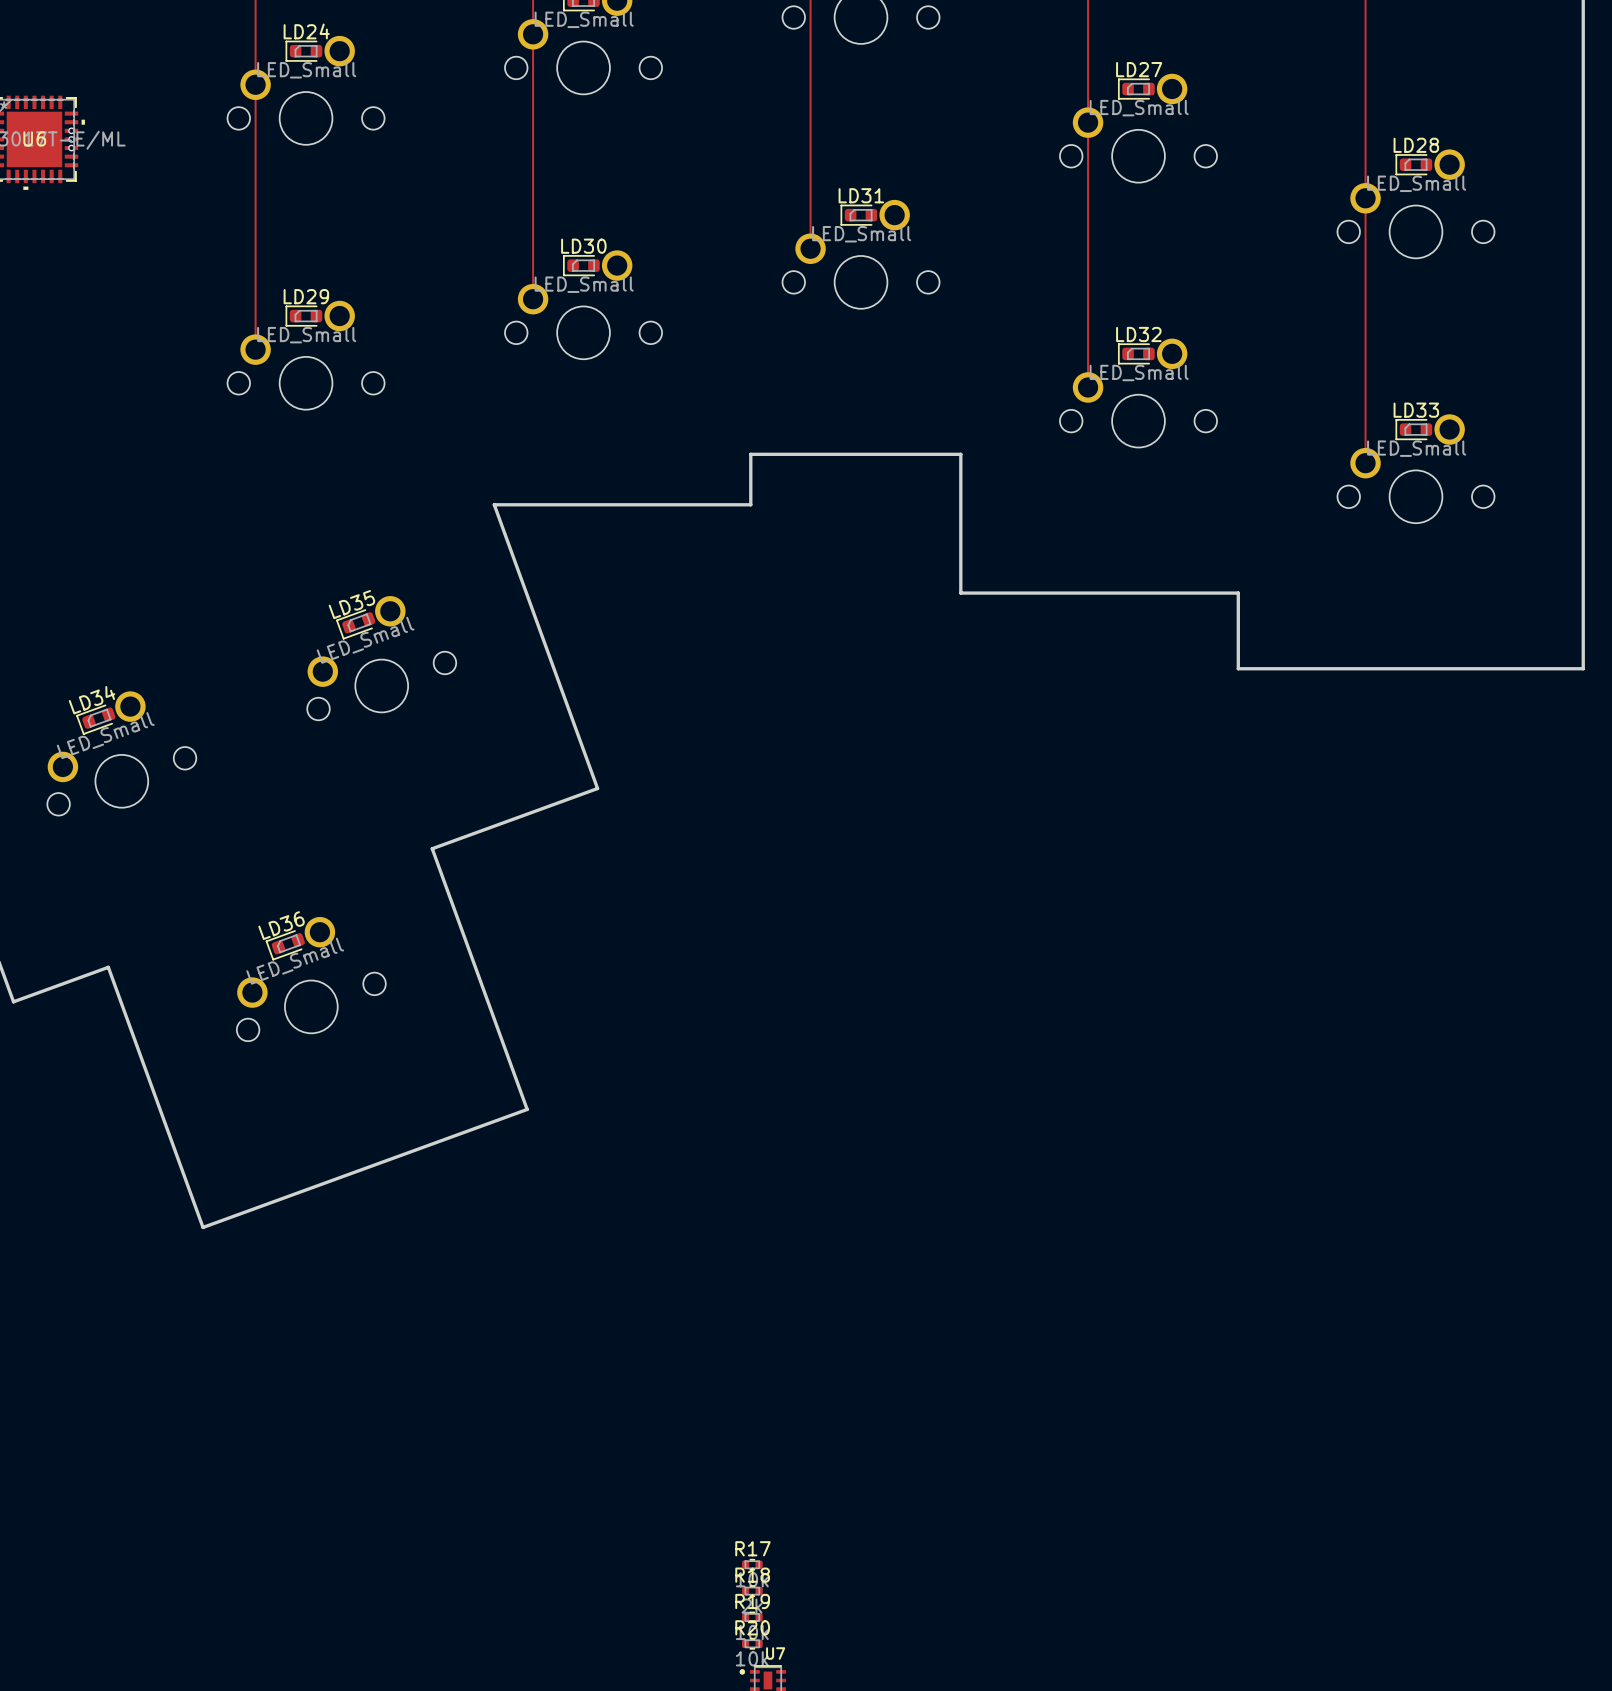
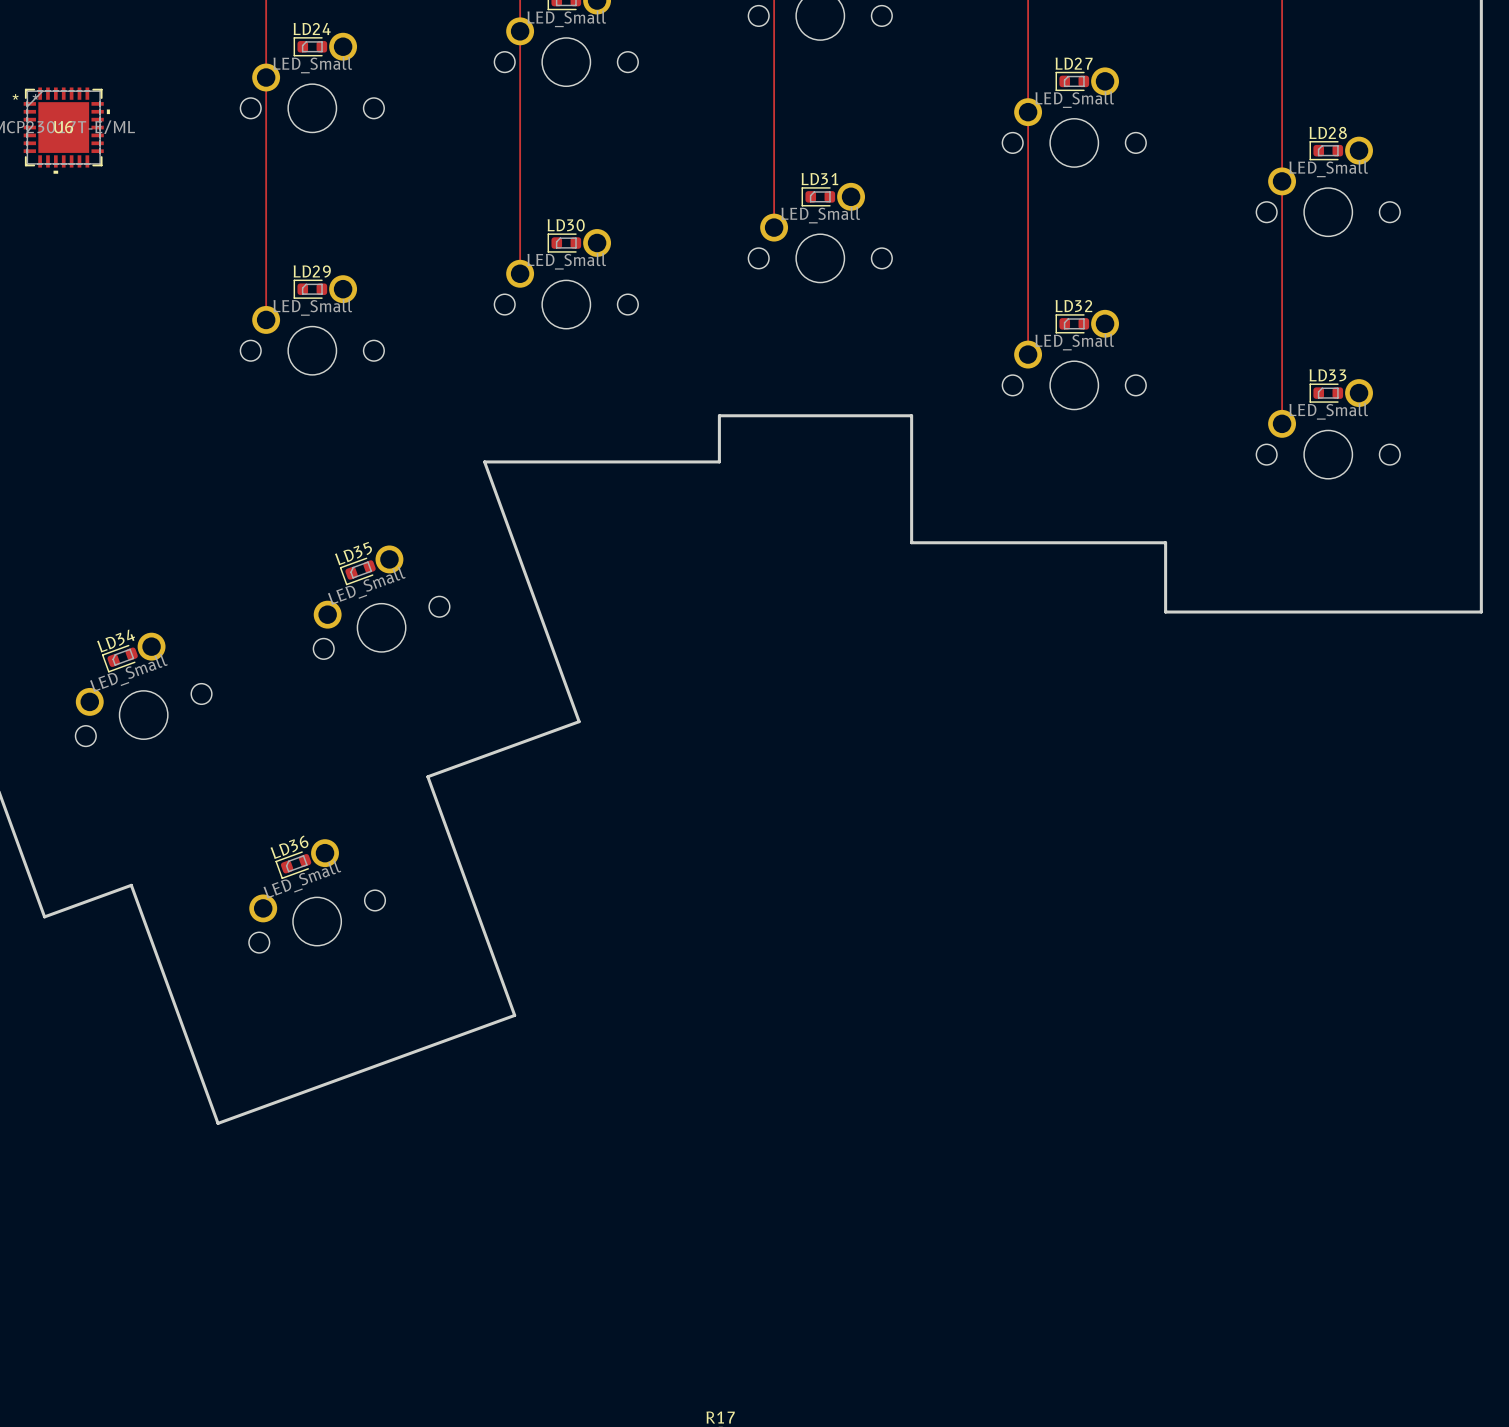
via: (71, 130) -> none
via: (71, 139) -> none
via: (71, 148) -> none

